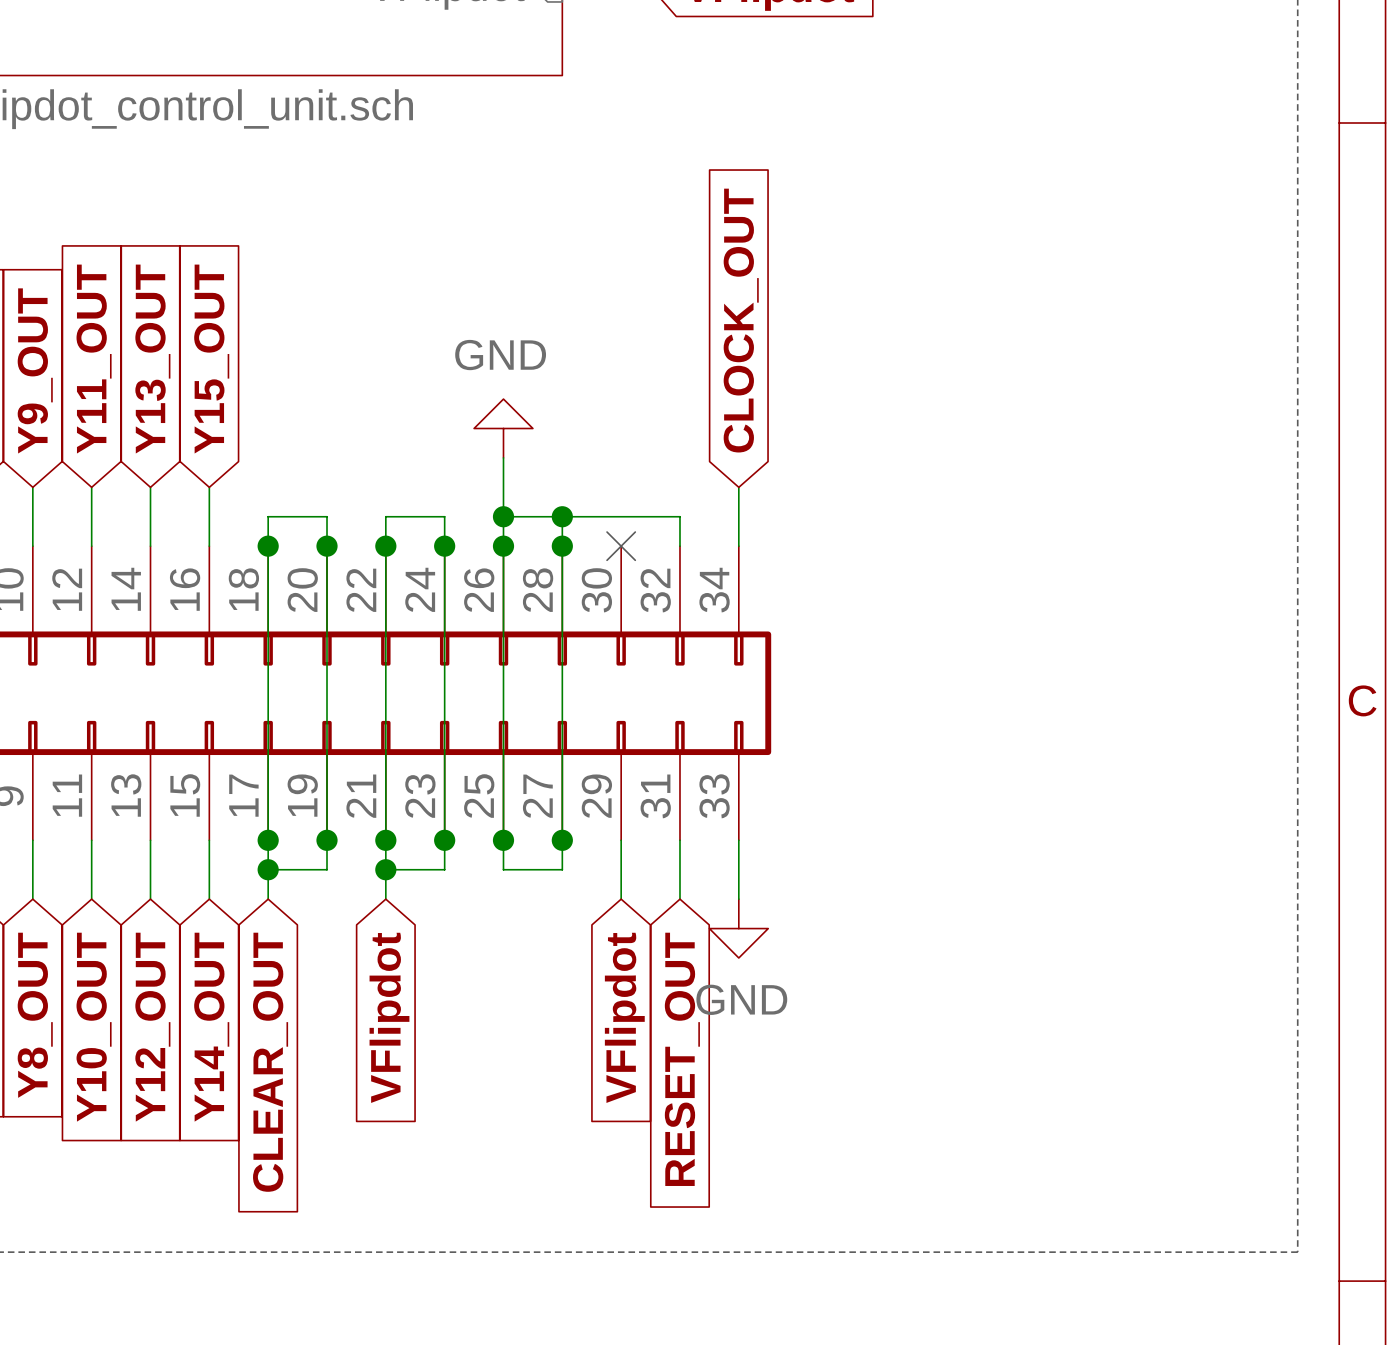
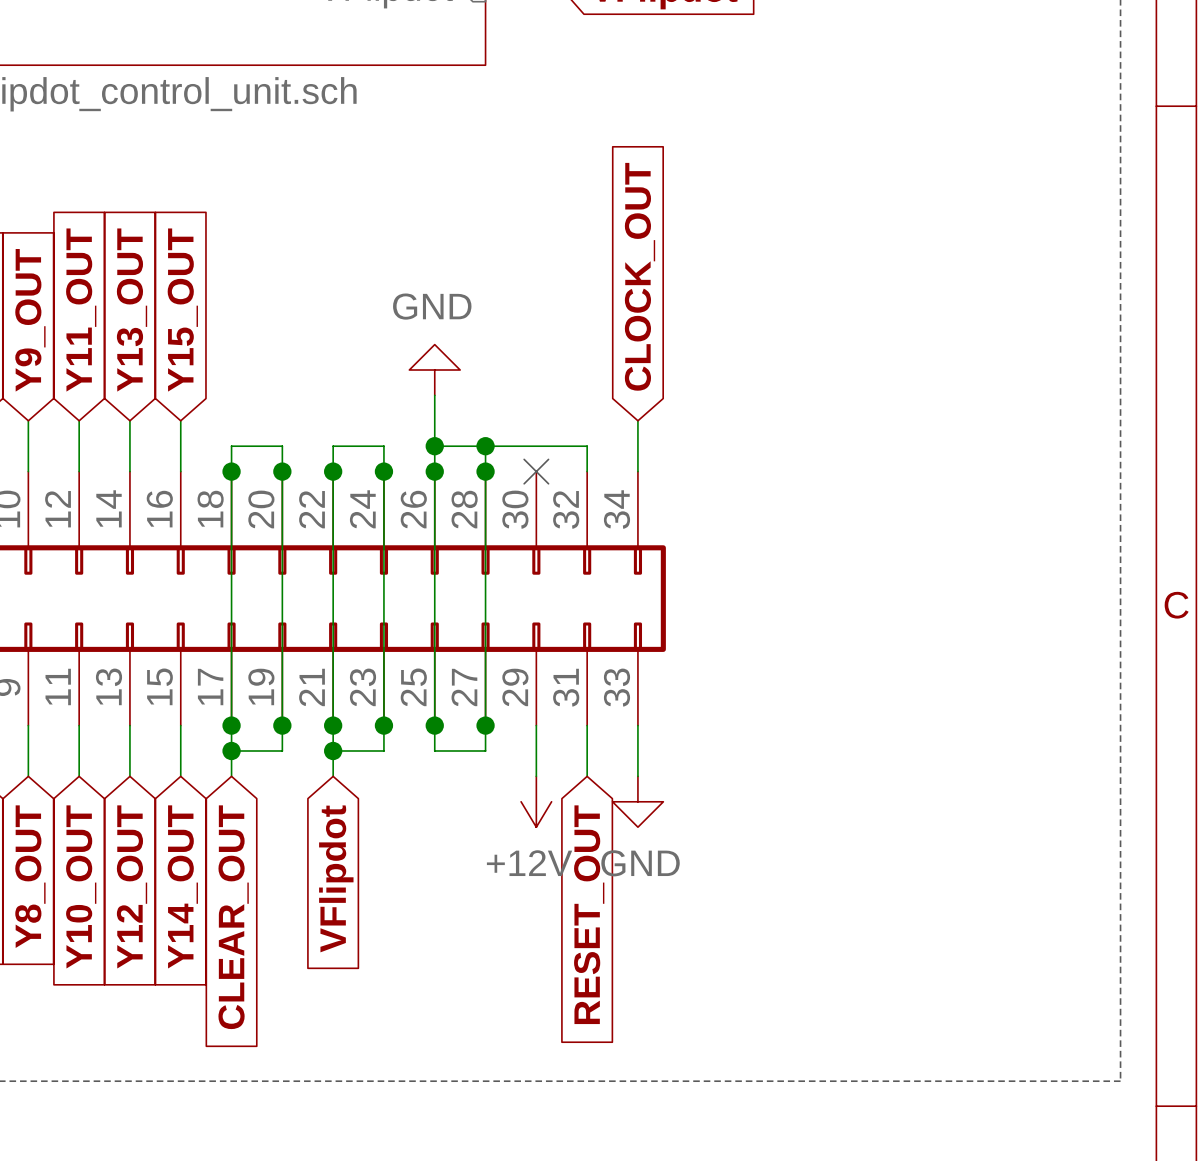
power symbol: none -> +12V (536, 801)
global label: VFlipdot (624, 1017) -> none

